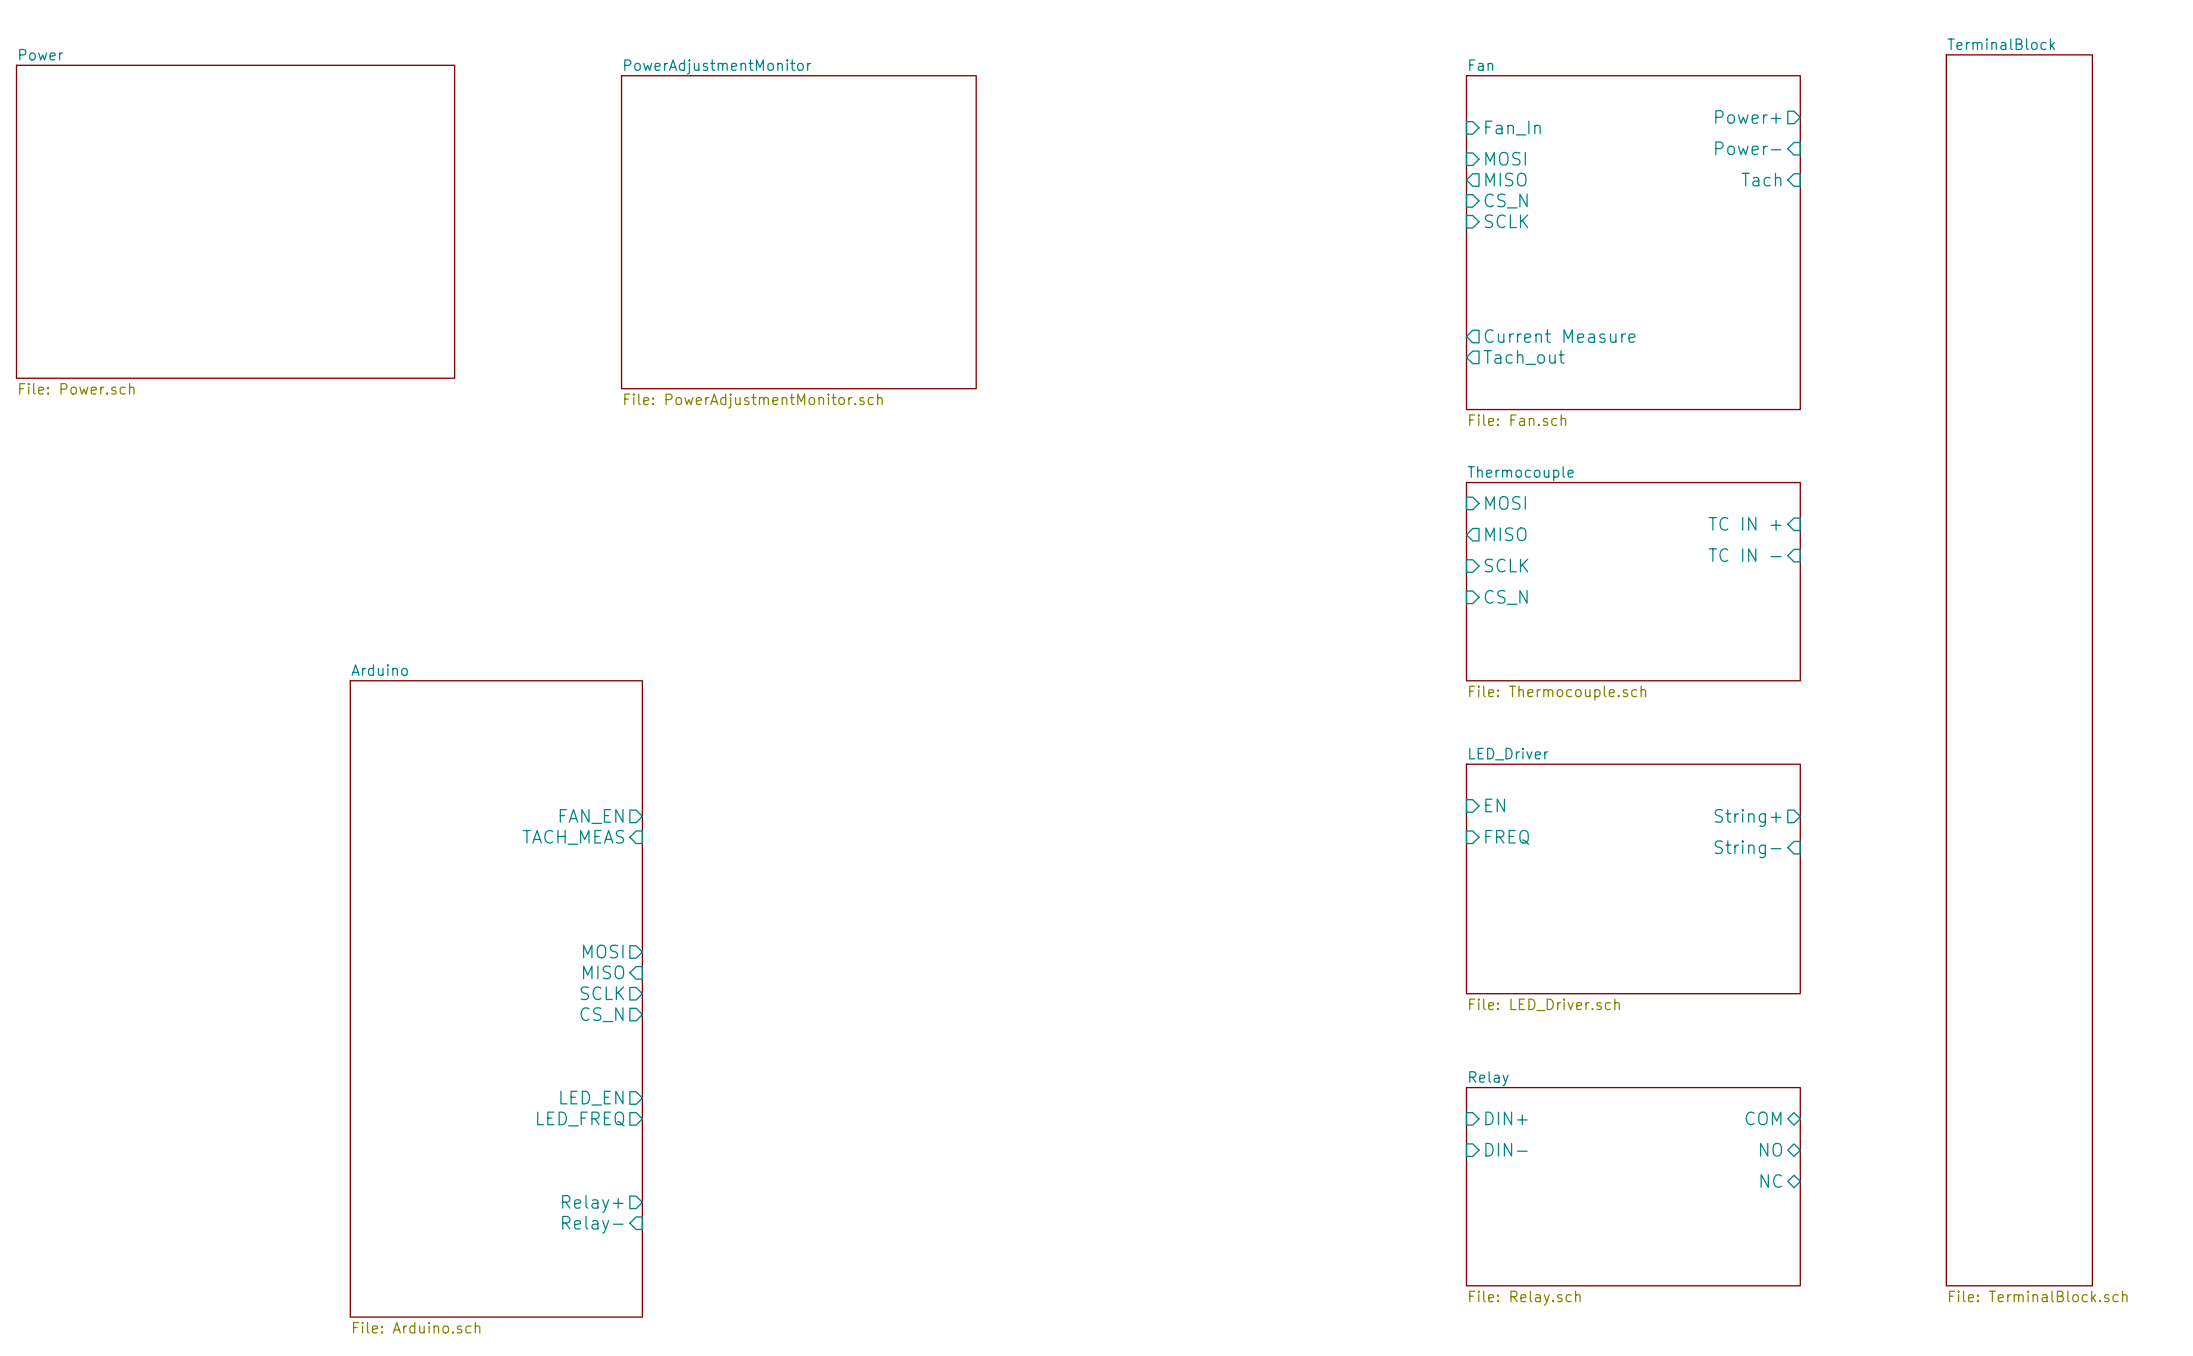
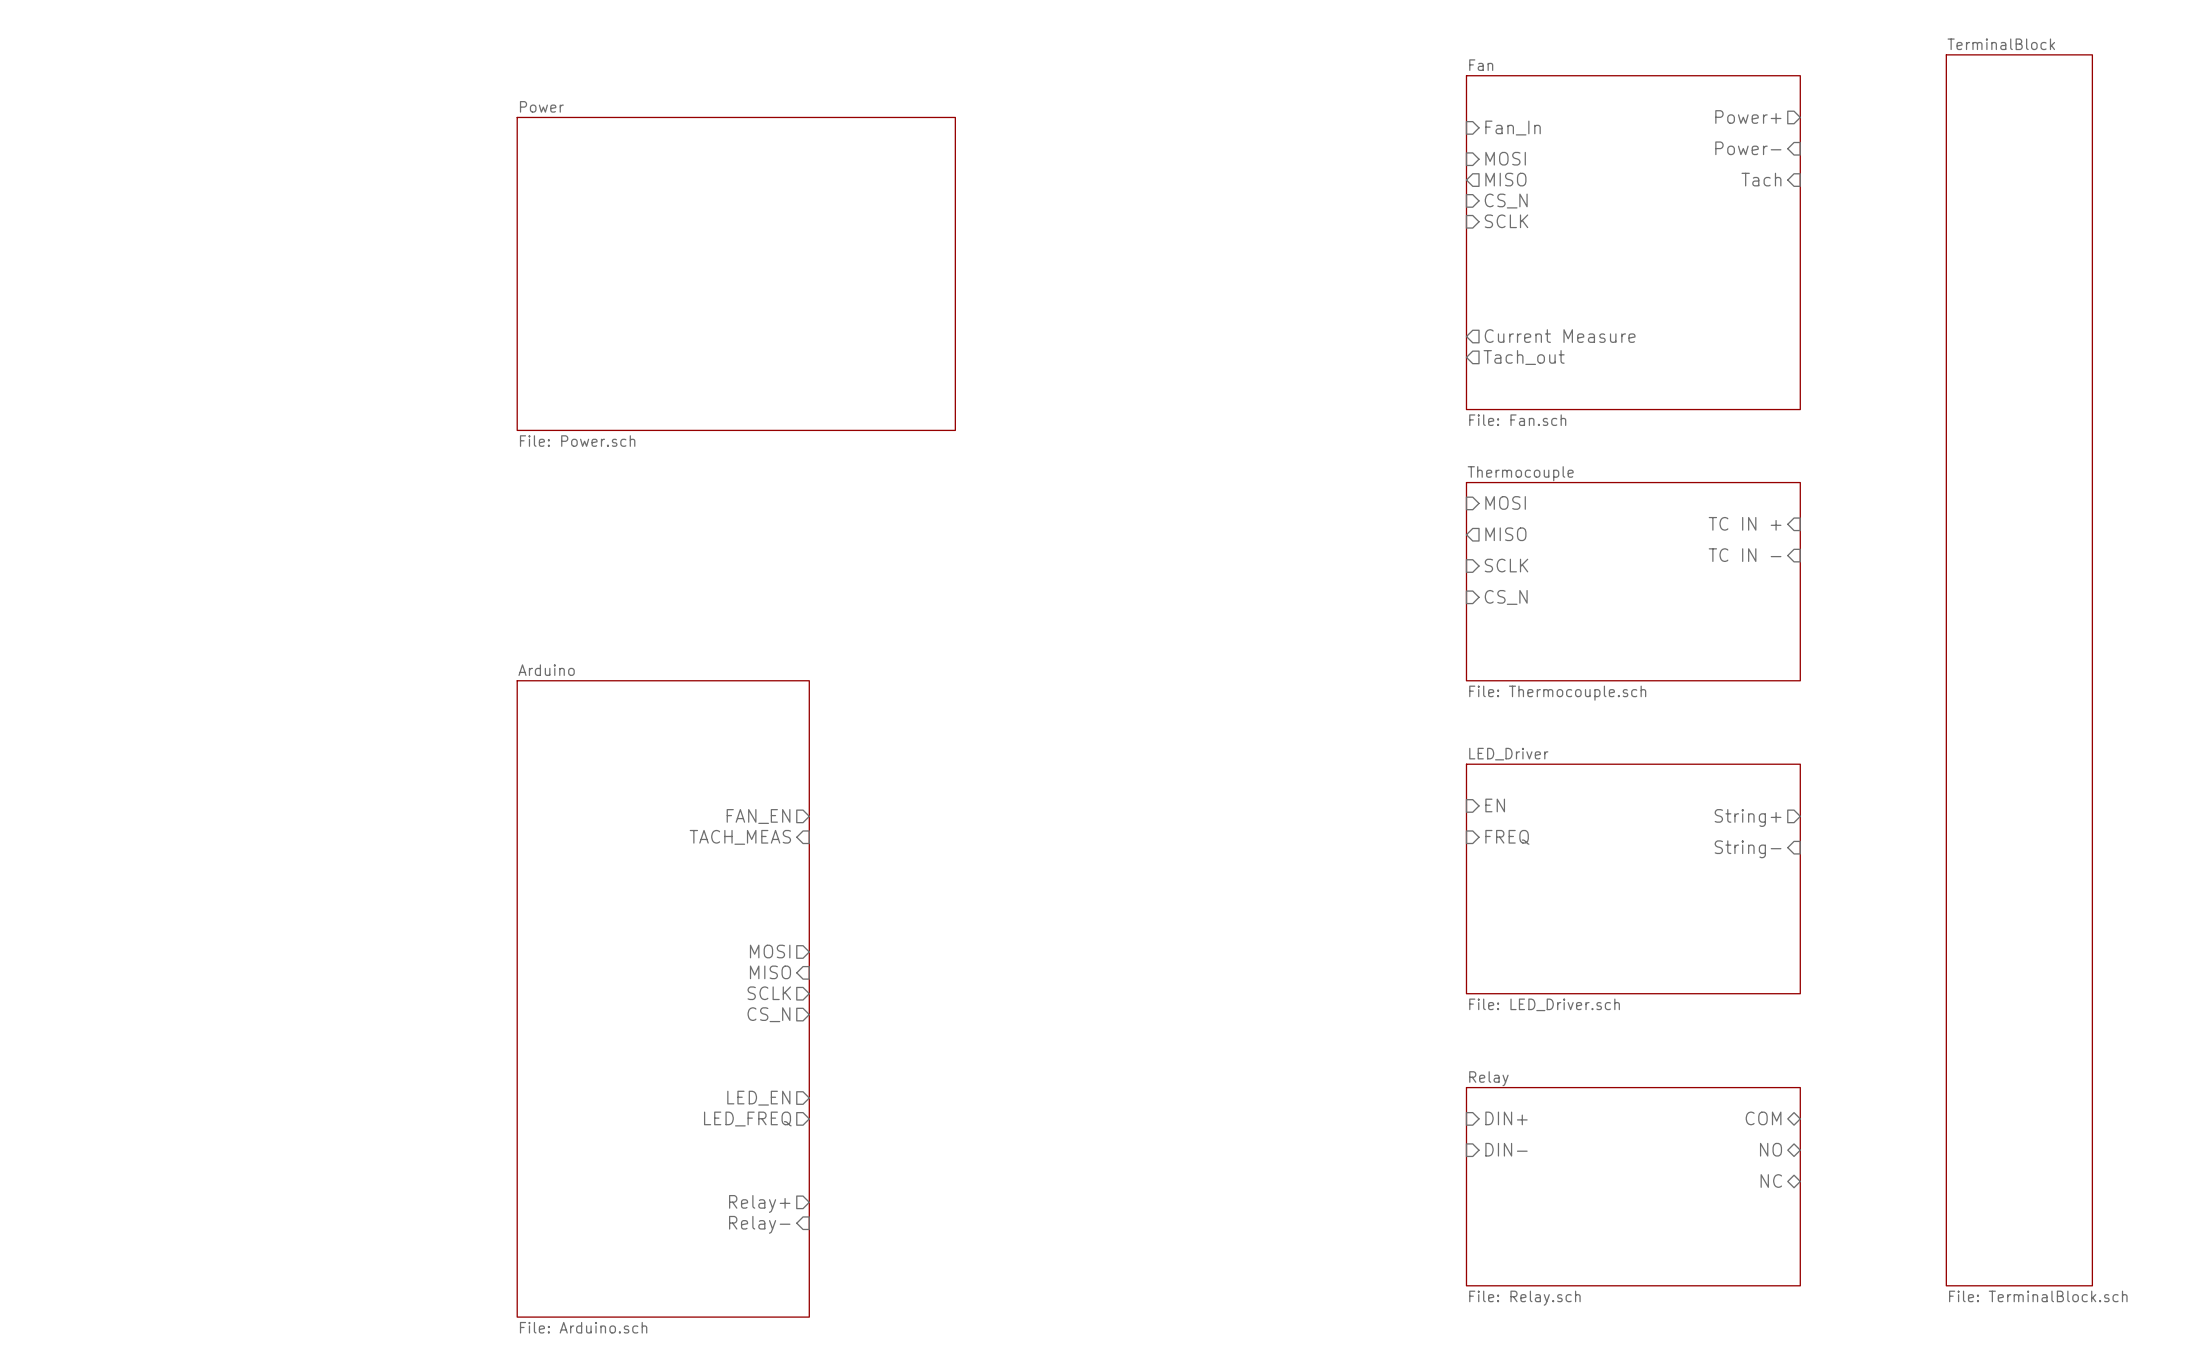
sheet Power: File: Power.sch (235, 221) -> none
sheet PowerAdjustmentMonitor: File: PowerAdjustmentMonitor.sch (798, 232) -> none
sheet Power: none -> File: Power.sch (736, 273)
sheet pin position: FAN_EN (591, 816) -> FAN_EN (758, 816)
sheet pin position: TACH_MEAS (573, 837) -> TACH_MEAS (740, 837)
sheet pin position: MOSI (603, 951) -> MOSI (770, 951)
sheet pin position: MISO (603, 972) -> MISO (770, 972)
sheet pin position: SCLK (602, 993) -> SCLK (769, 993)
sheet Arduino position: (496, 998) -> (663, 998)
sheet pin position: CS_N (602, 1014) -> CS_N (768, 1014)
sheet pin position: LED_EN (591, 1098) -> LED_EN (758, 1098)
sheet pin position: LED_FREQ (580, 1119) -> LED_FREQ (747, 1119)
sheet pin position: Relay+ (592, 1203) -> Relay+ (759, 1203)
sheet pin position: Relay- (592, 1224) -> Relay- (759, 1224)

